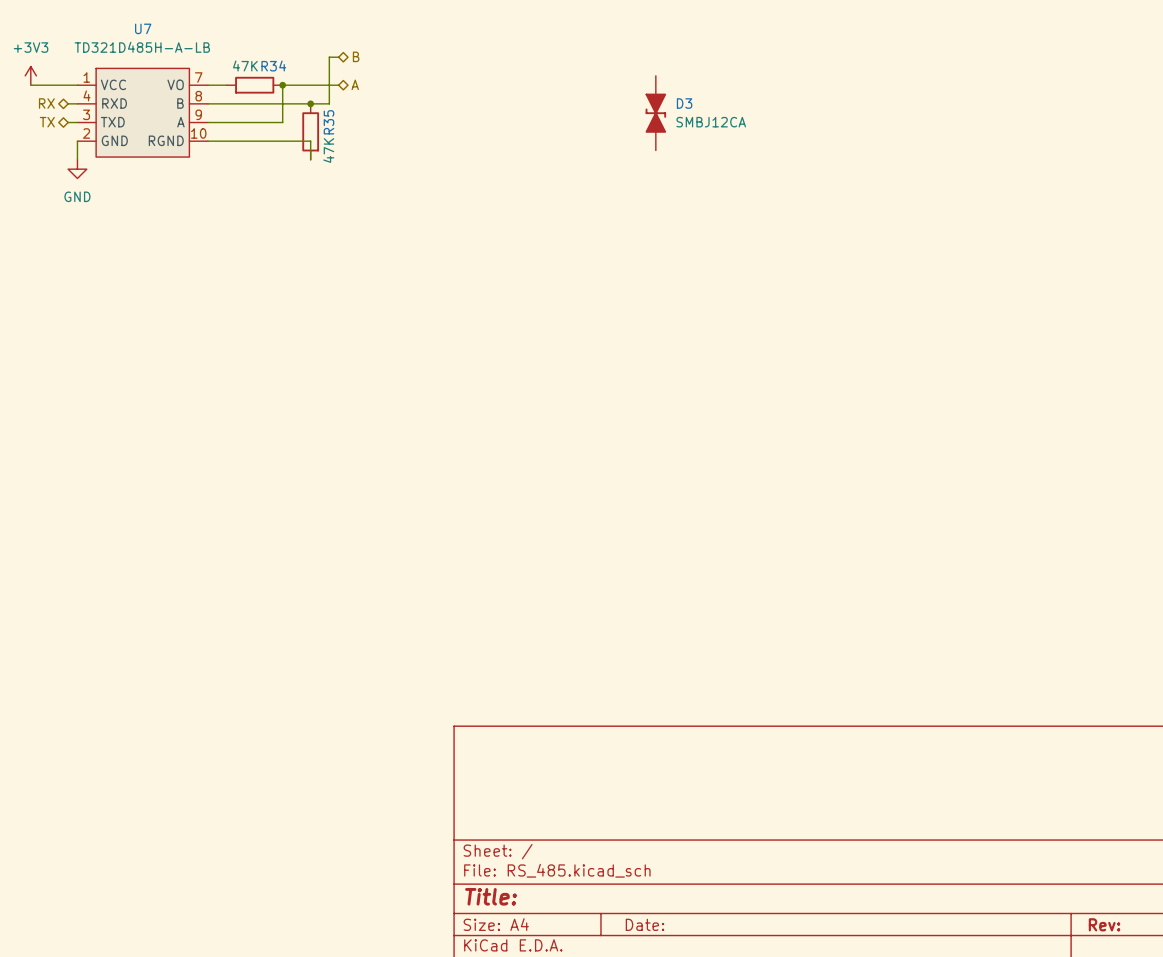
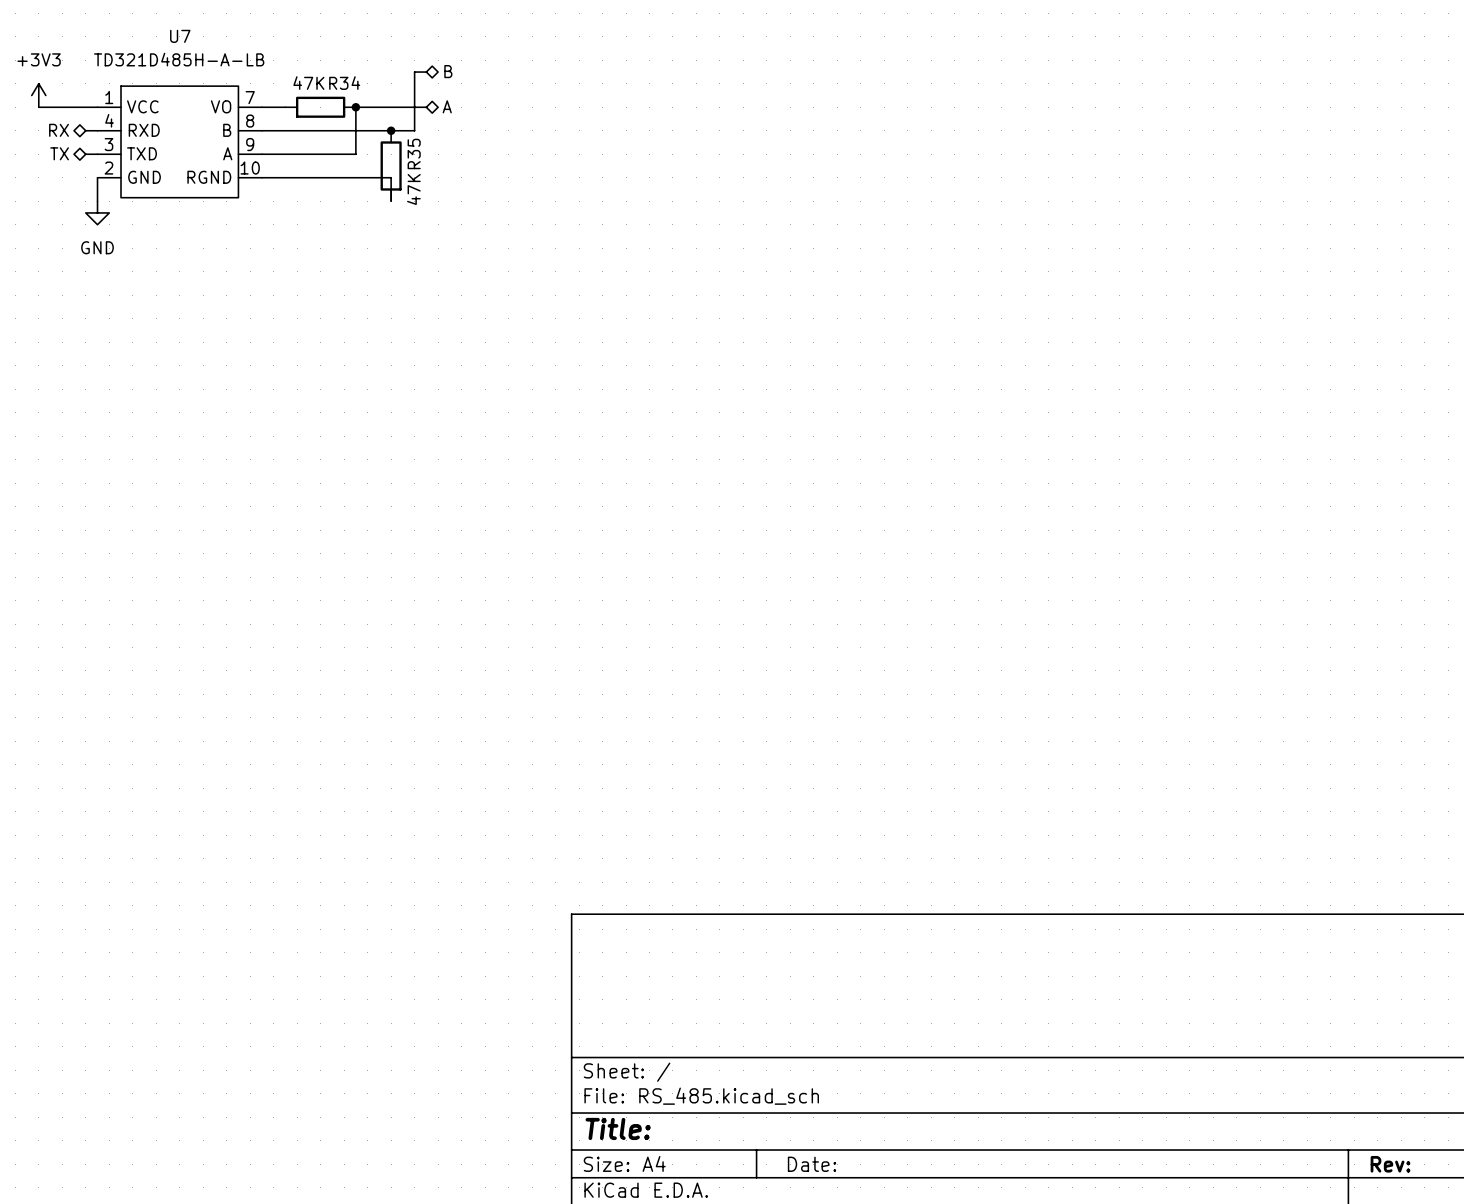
D3: SMBJ12CA (655, 113) -> none

